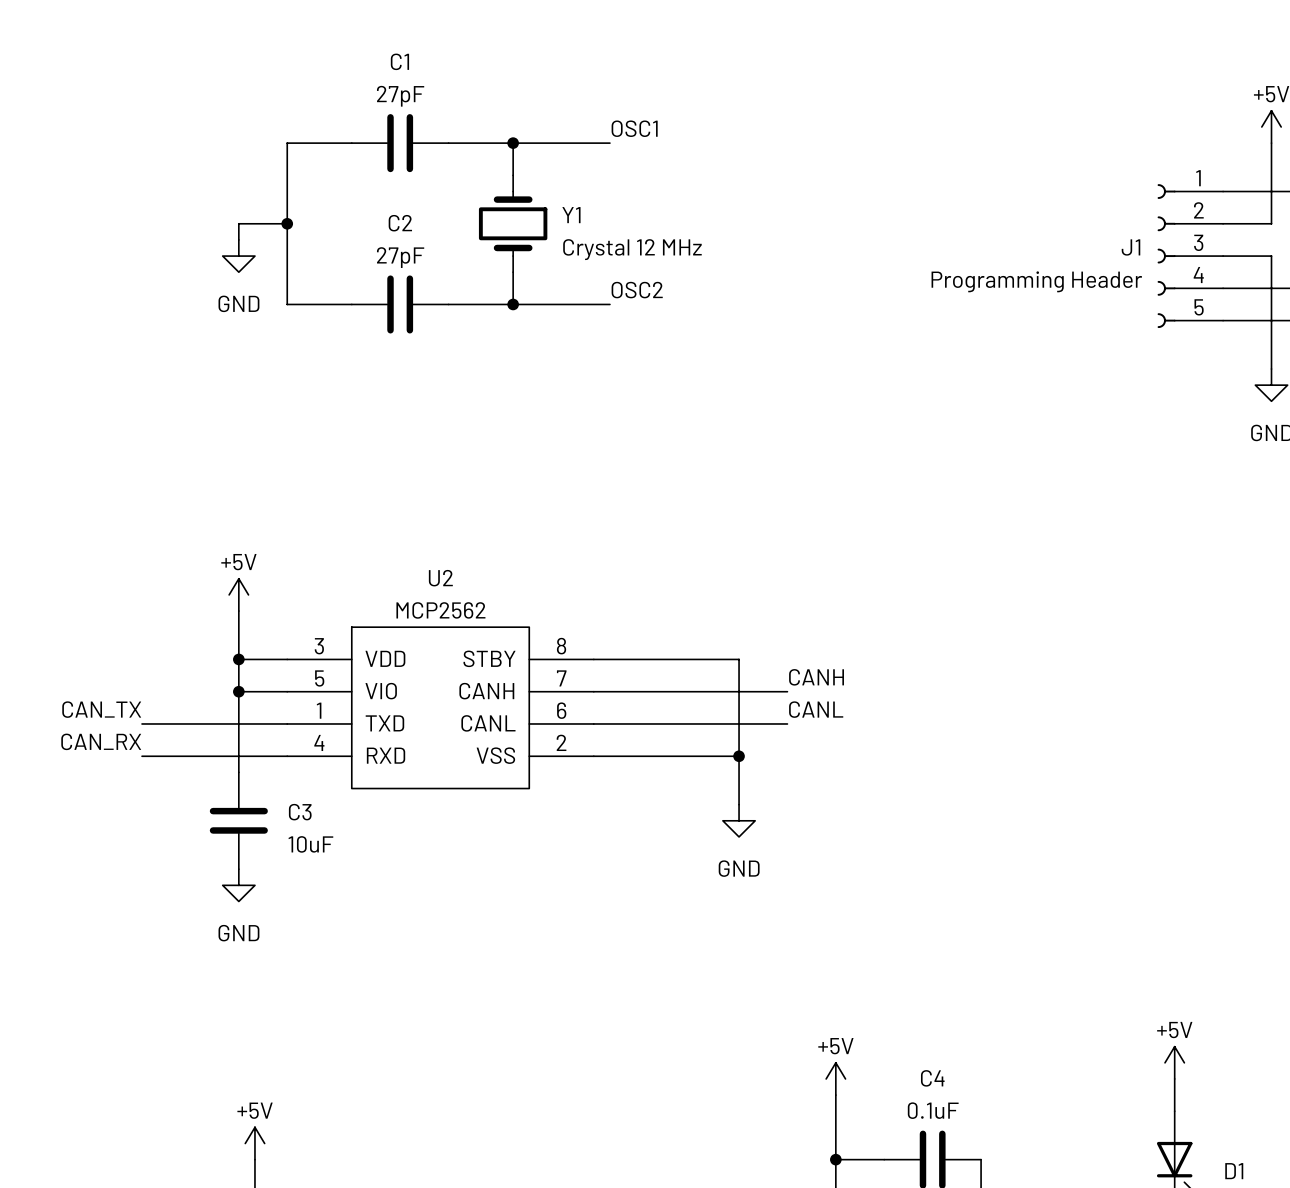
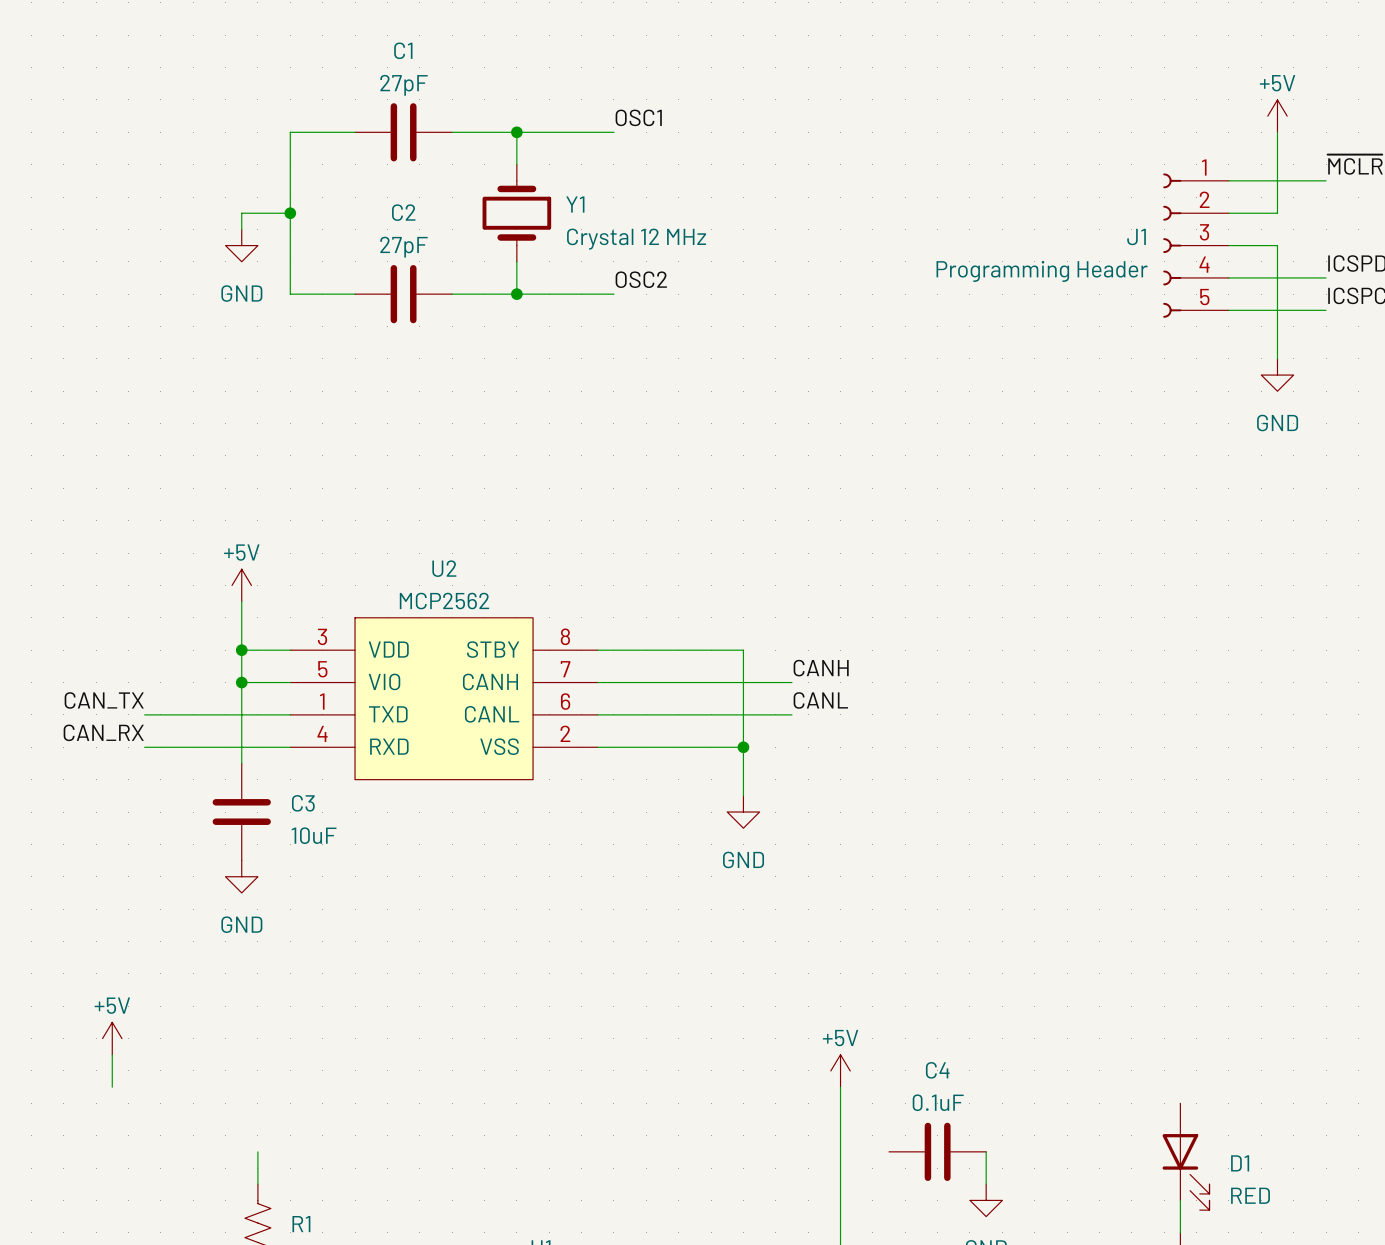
wire: none -> (112, 1054) (112, 1087)
power symbol: +5V (1174, 1062) -> none
wire: (1174, 1078) (1174, 1111) -> none
power symbol position: +5V (254, 1143) -> +5V (112, 1038)
wire: (835, 1159) (884, 1159) -> none
junction: (835, 1159) -> none

